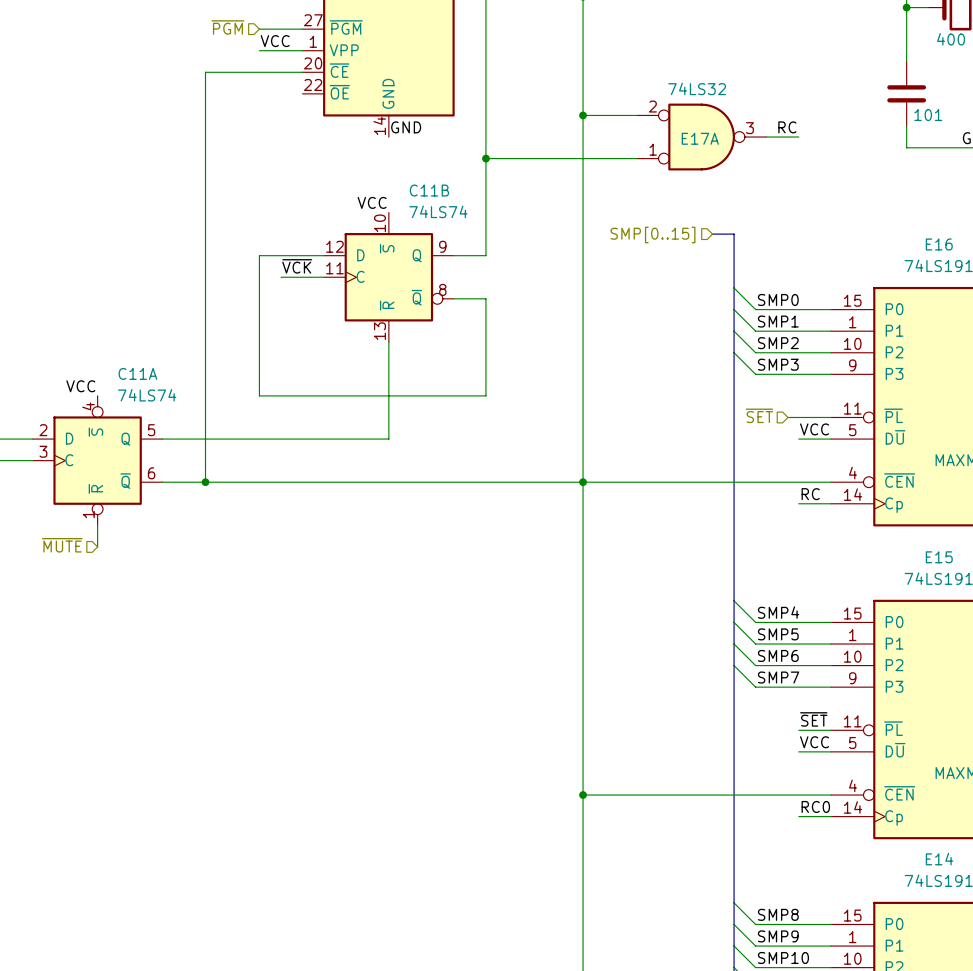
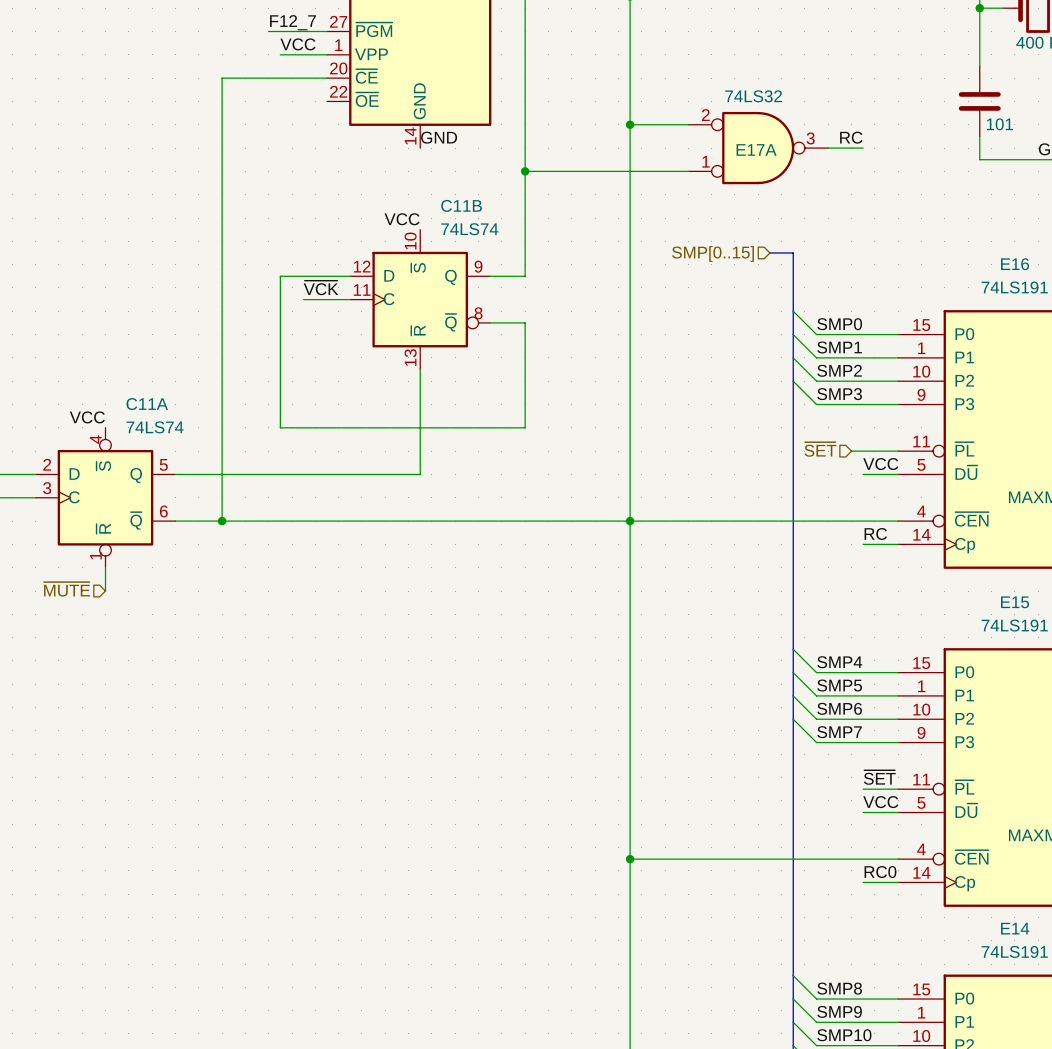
label: none -> F12_7 (292, 22)
hierarchical label: ~{PGM} (227, 27) -> none
wire: none -> (268, 31) (280, 31)

